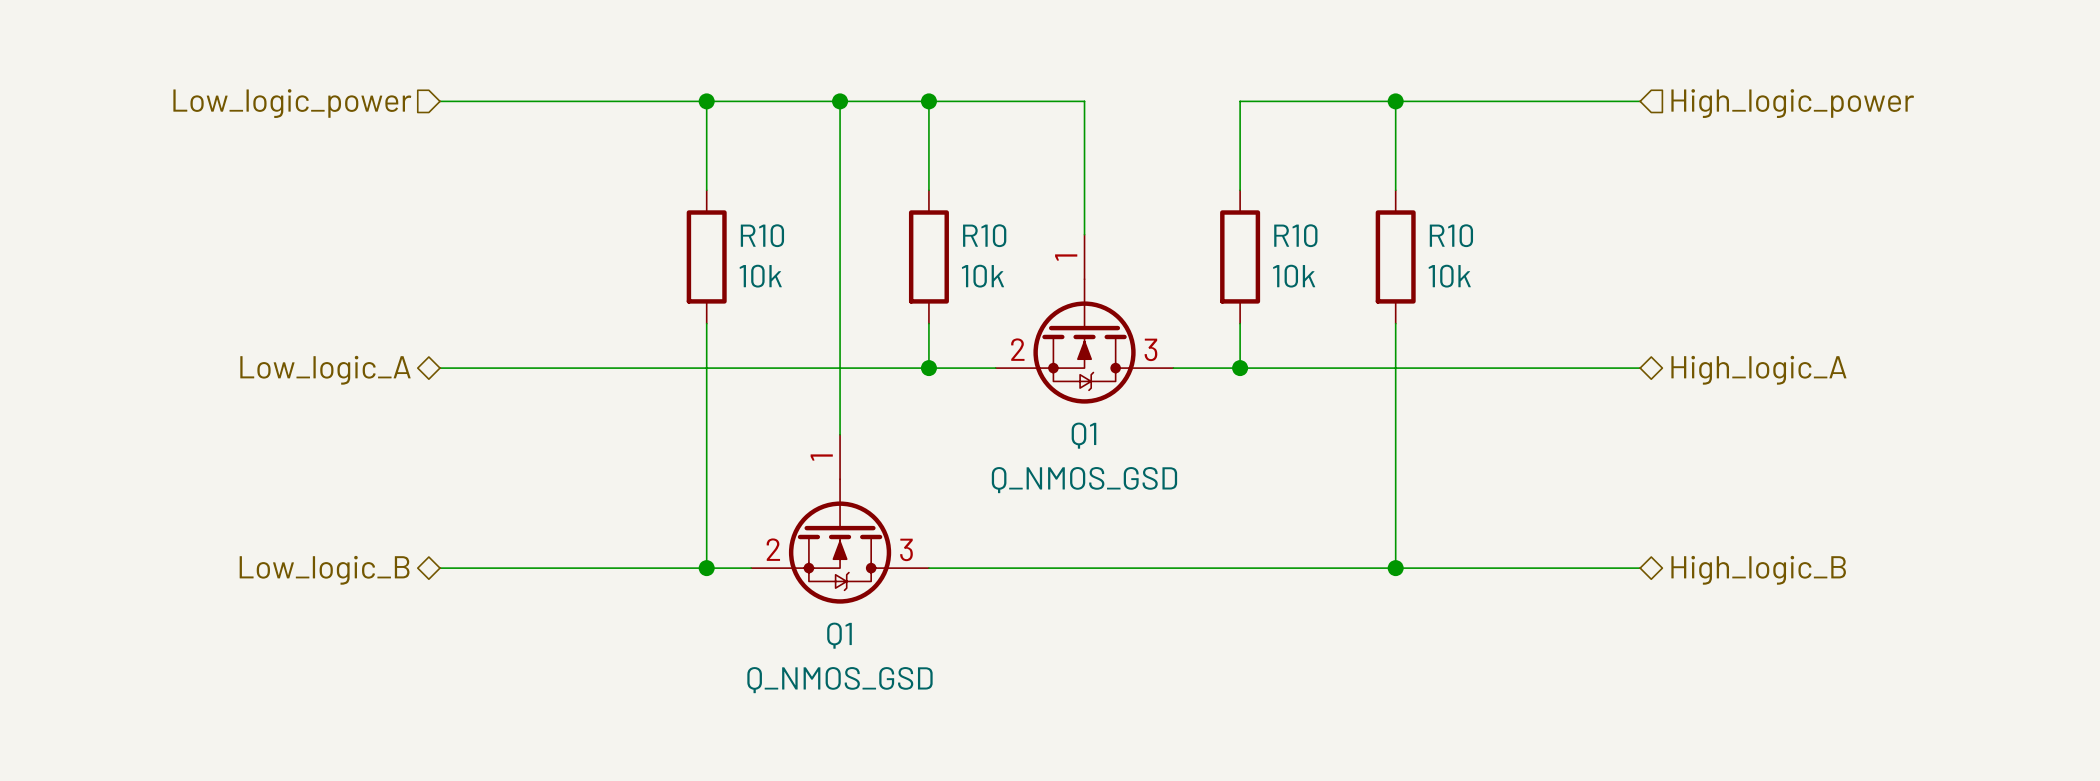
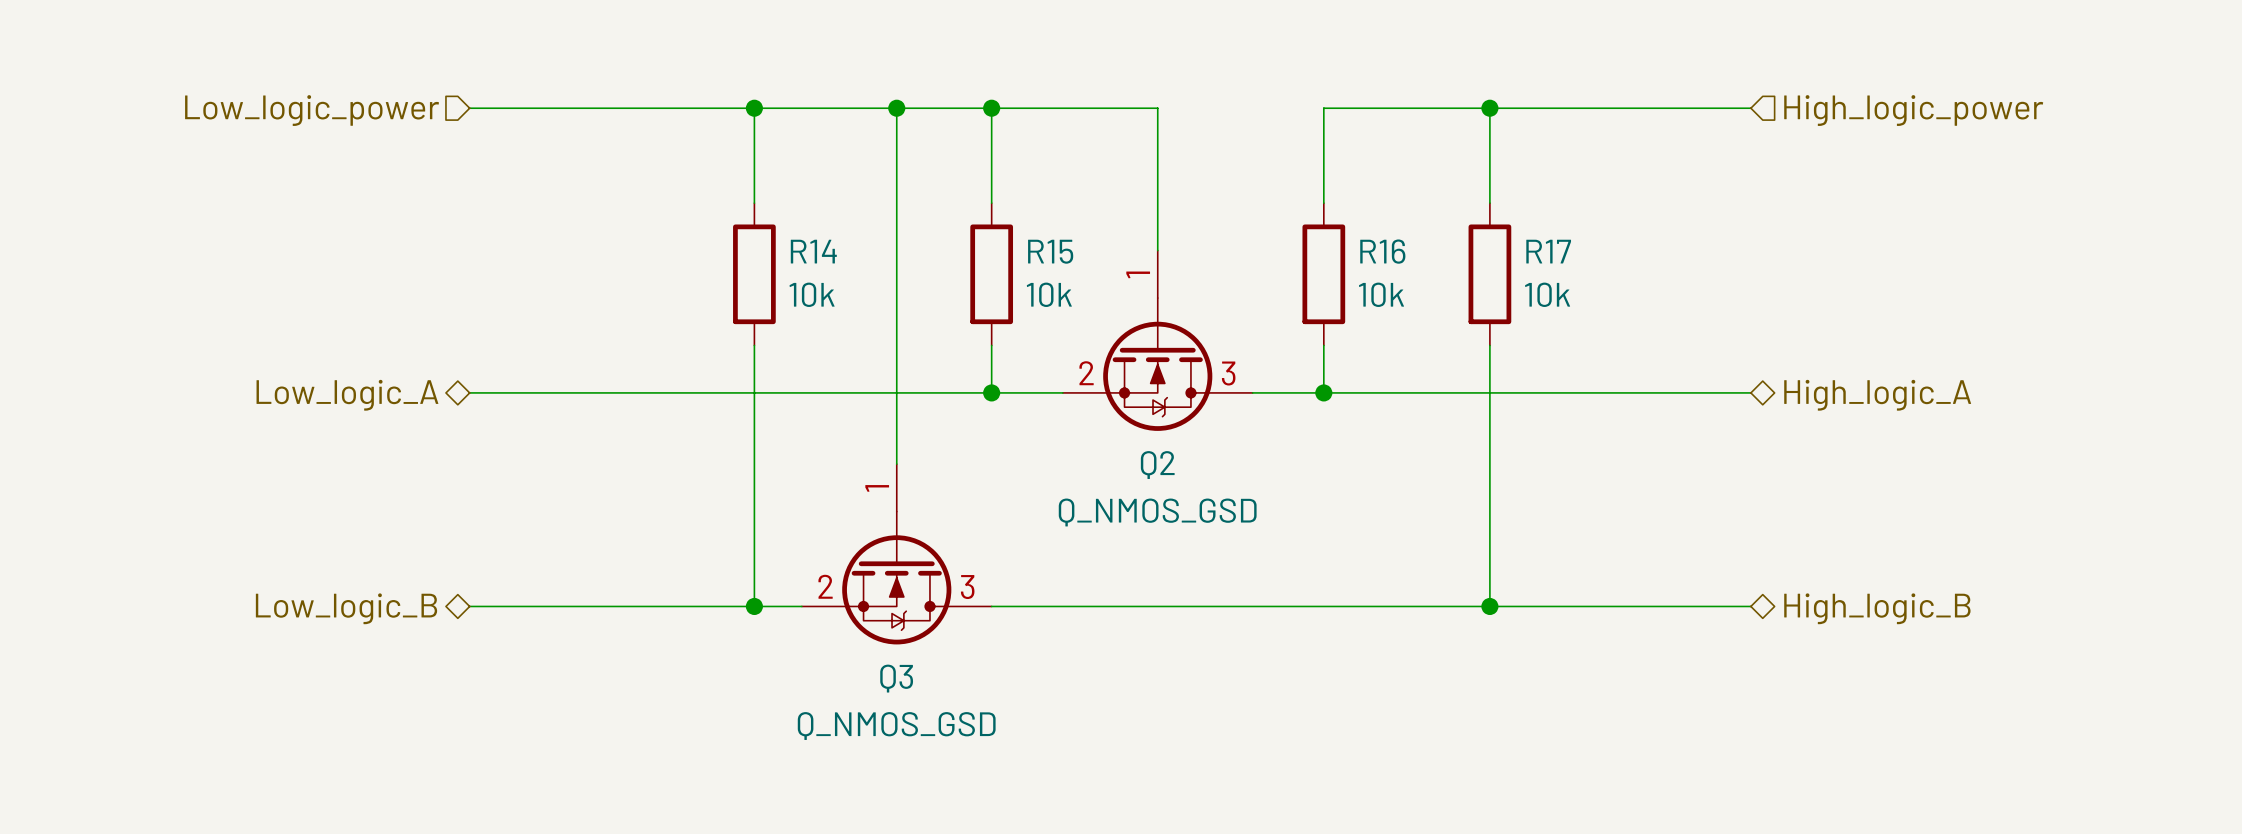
R10 name: R10 (762, 235) -> R14 (813, 251)
R10 name: R10 (984, 235) -> R15 (1050, 251)
R10 name: R10 (1295, 235) -> R16 (1382, 251)
R10 name: R10 (1451, 235) -> R17 (1548, 251)
Q1 name: Q1 (1083, 435) -> Q2 (1157, 465)
Q1 name: Q1 (839, 635) -> Q3 (896, 678)

